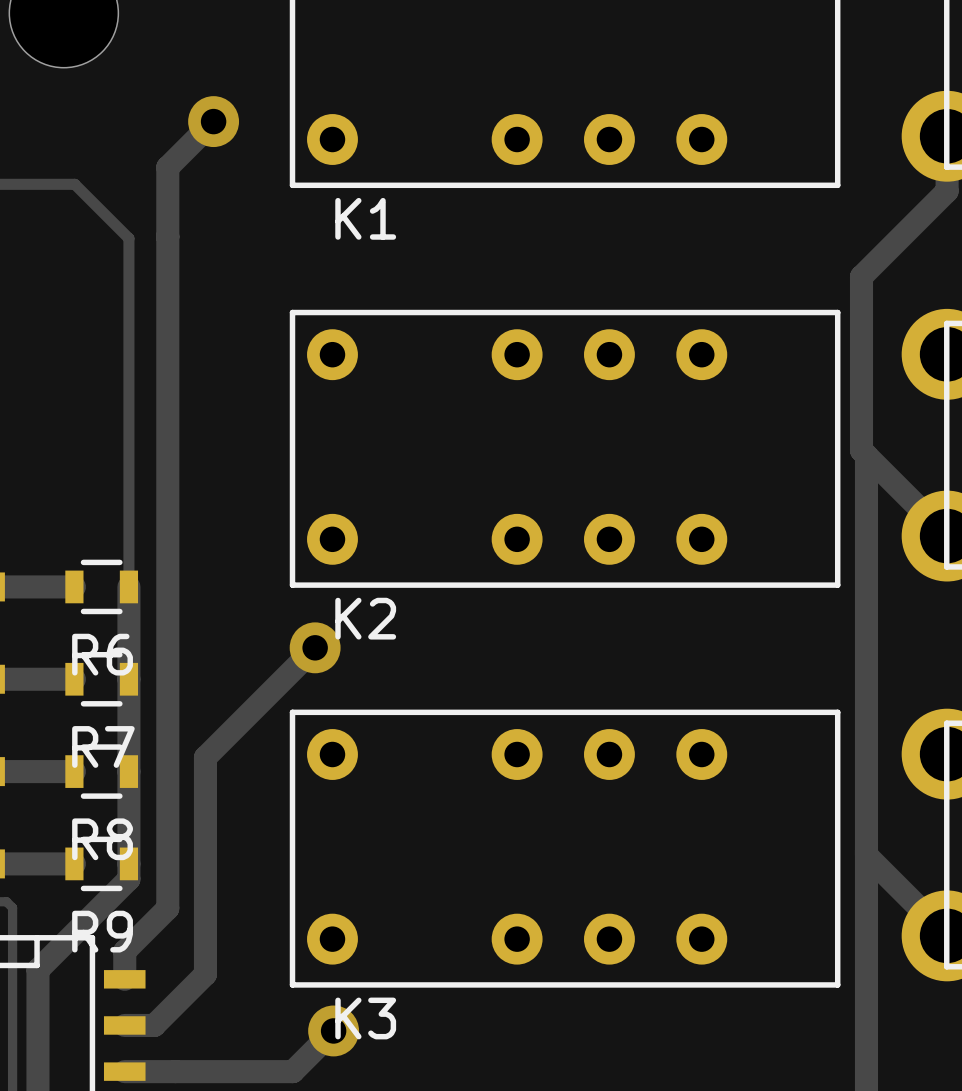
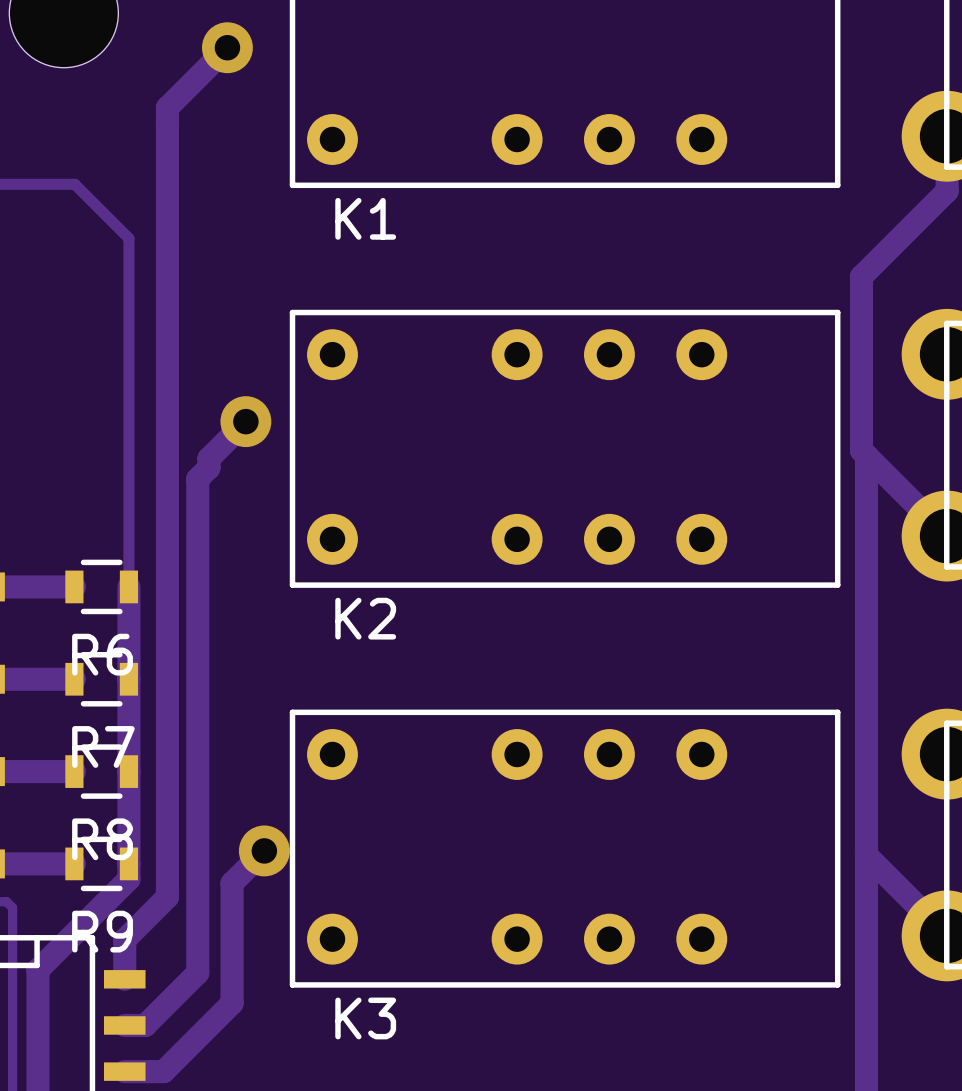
track: (213, 121) (167, 167) (167, 908) (124, 951) -> (227, 47) (167, 107) (167, 897) (124, 939) (124, 951)
via position: (213, 121) -> (227, 47)
via: none -> (245, 421)
track: (315, 647) (205, 757) (205, 974) (154, 1025) (145, 1025) -> (245, 421) (208, 458) (208, 467) (197, 478) (197, 972) (145, 1025)
via: (315, 647) -> none
via: none -> (264, 850)
track: (333, 1030) (292, 1071) (163, 1071) -> (264, 850) (232, 883) (232, 1003) (163, 1071)
via: (333, 1030) -> none

